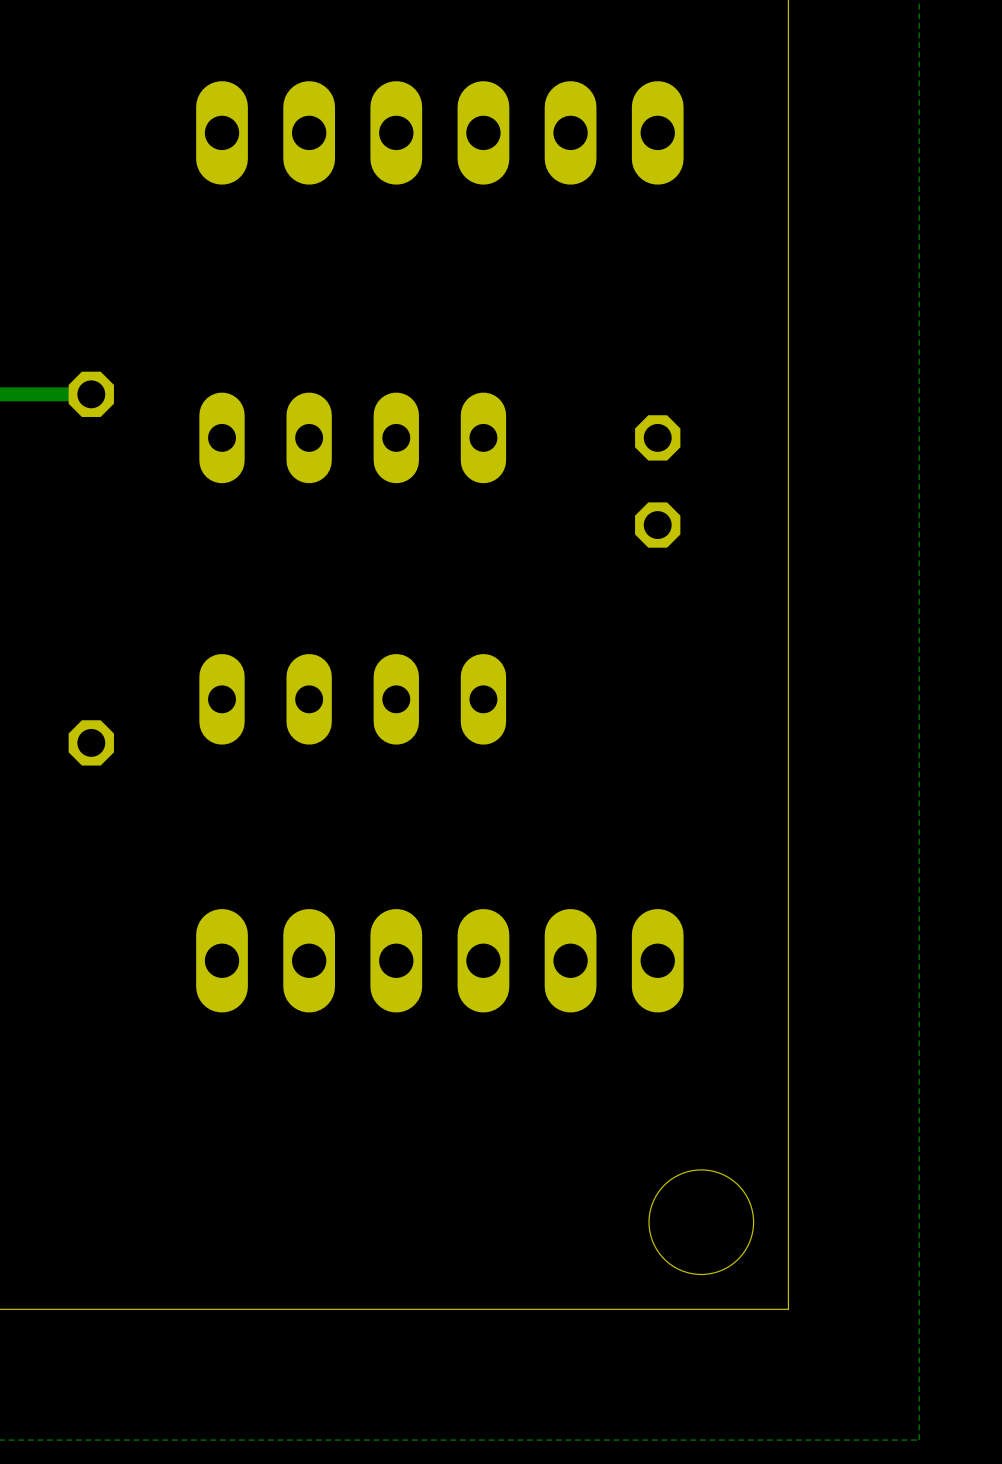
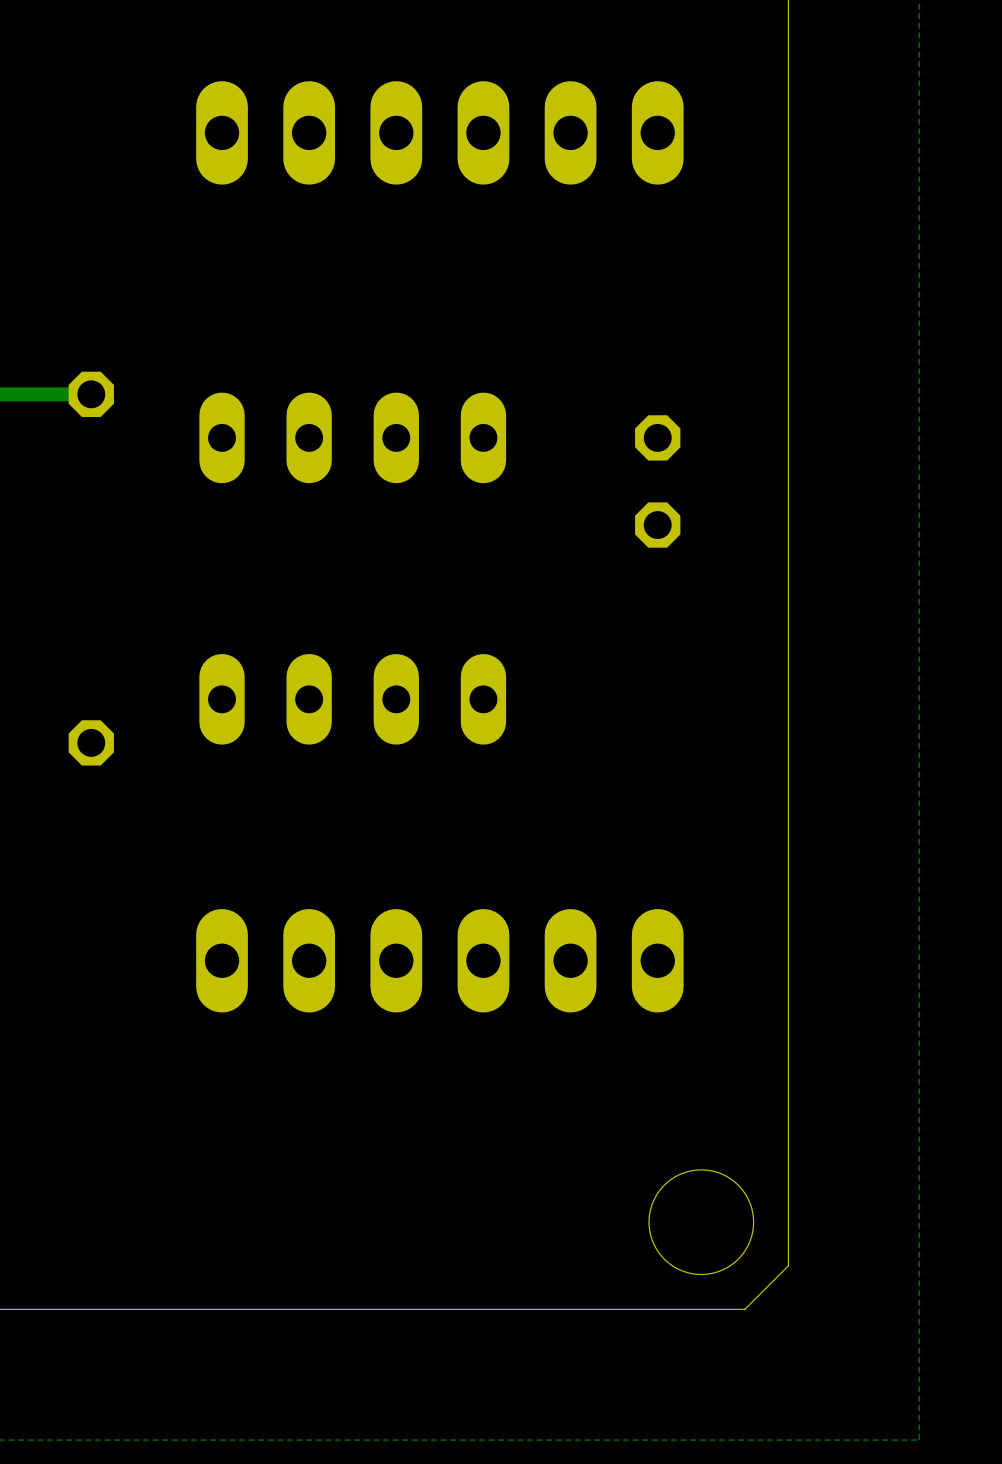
board edge: (788, 1265) (788, 1309) (744, 1309) -> (788, 1265) (744, 1309)

